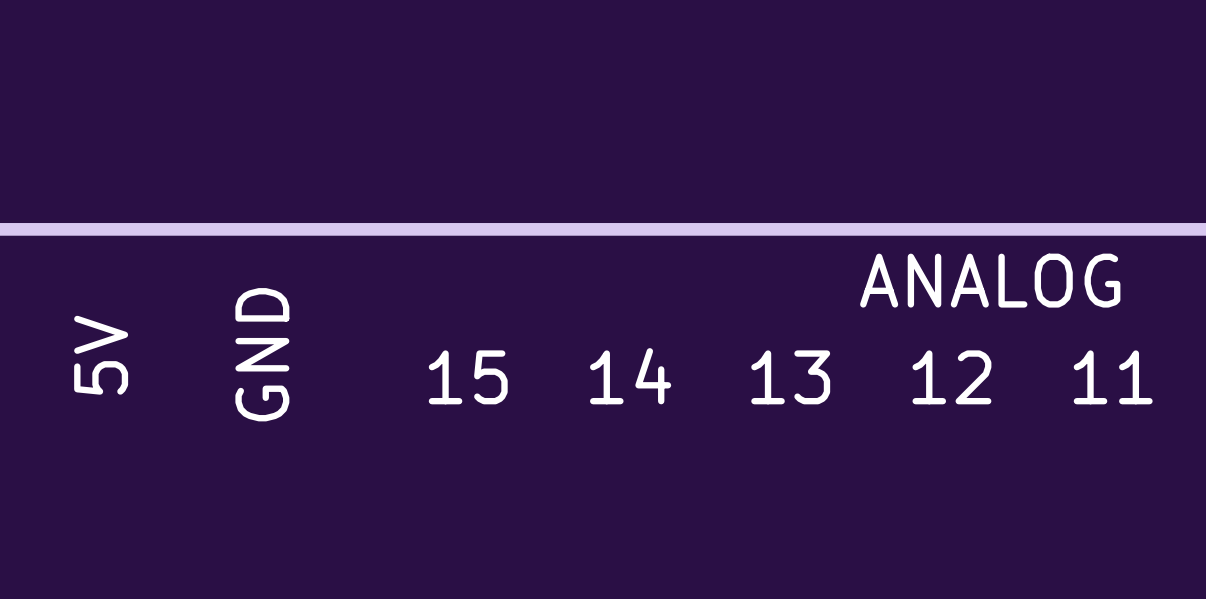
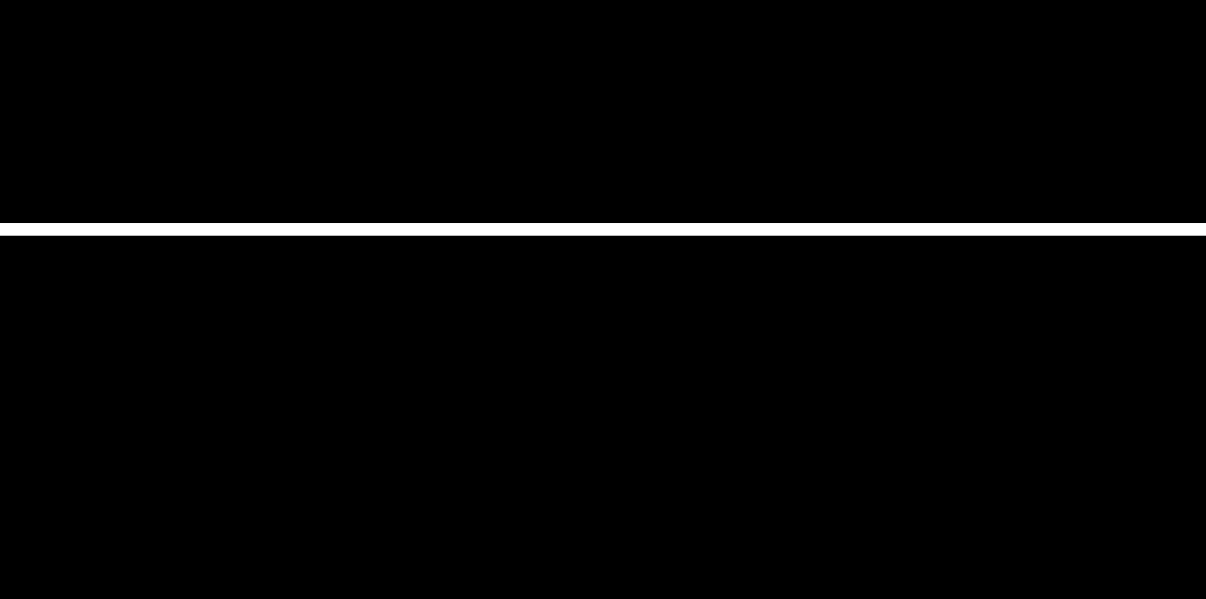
text: ANALOG (990, 280) -> none
text: GND (262, 354) -> none
text: 5V (101, 355) -> none
text: 14 (630, 376) -> none
text: 15 (468, 377) -> none
text: 13 (790, 377) -> none
text: 12 (951, 377) -> none
text: 11 (1113, 377) -> none

